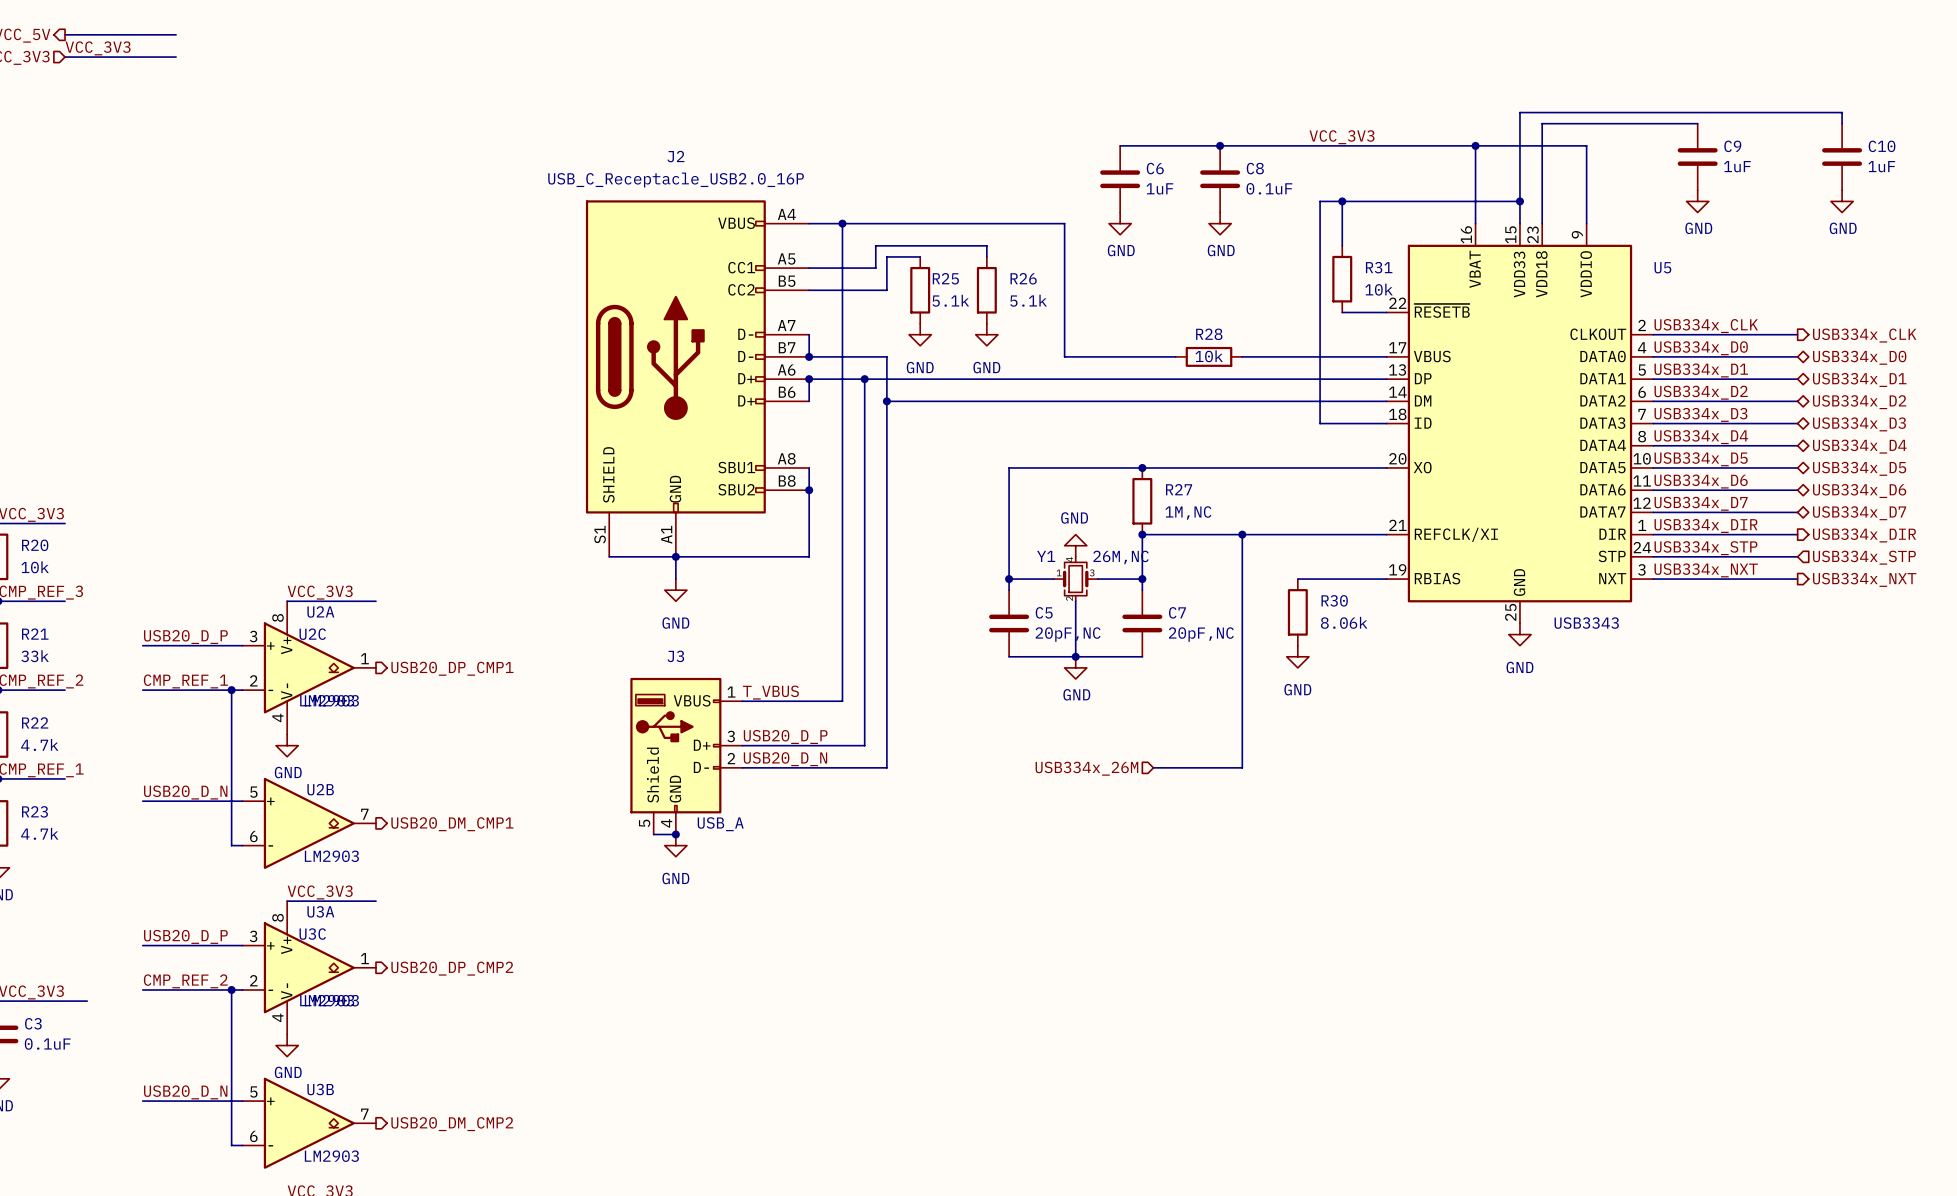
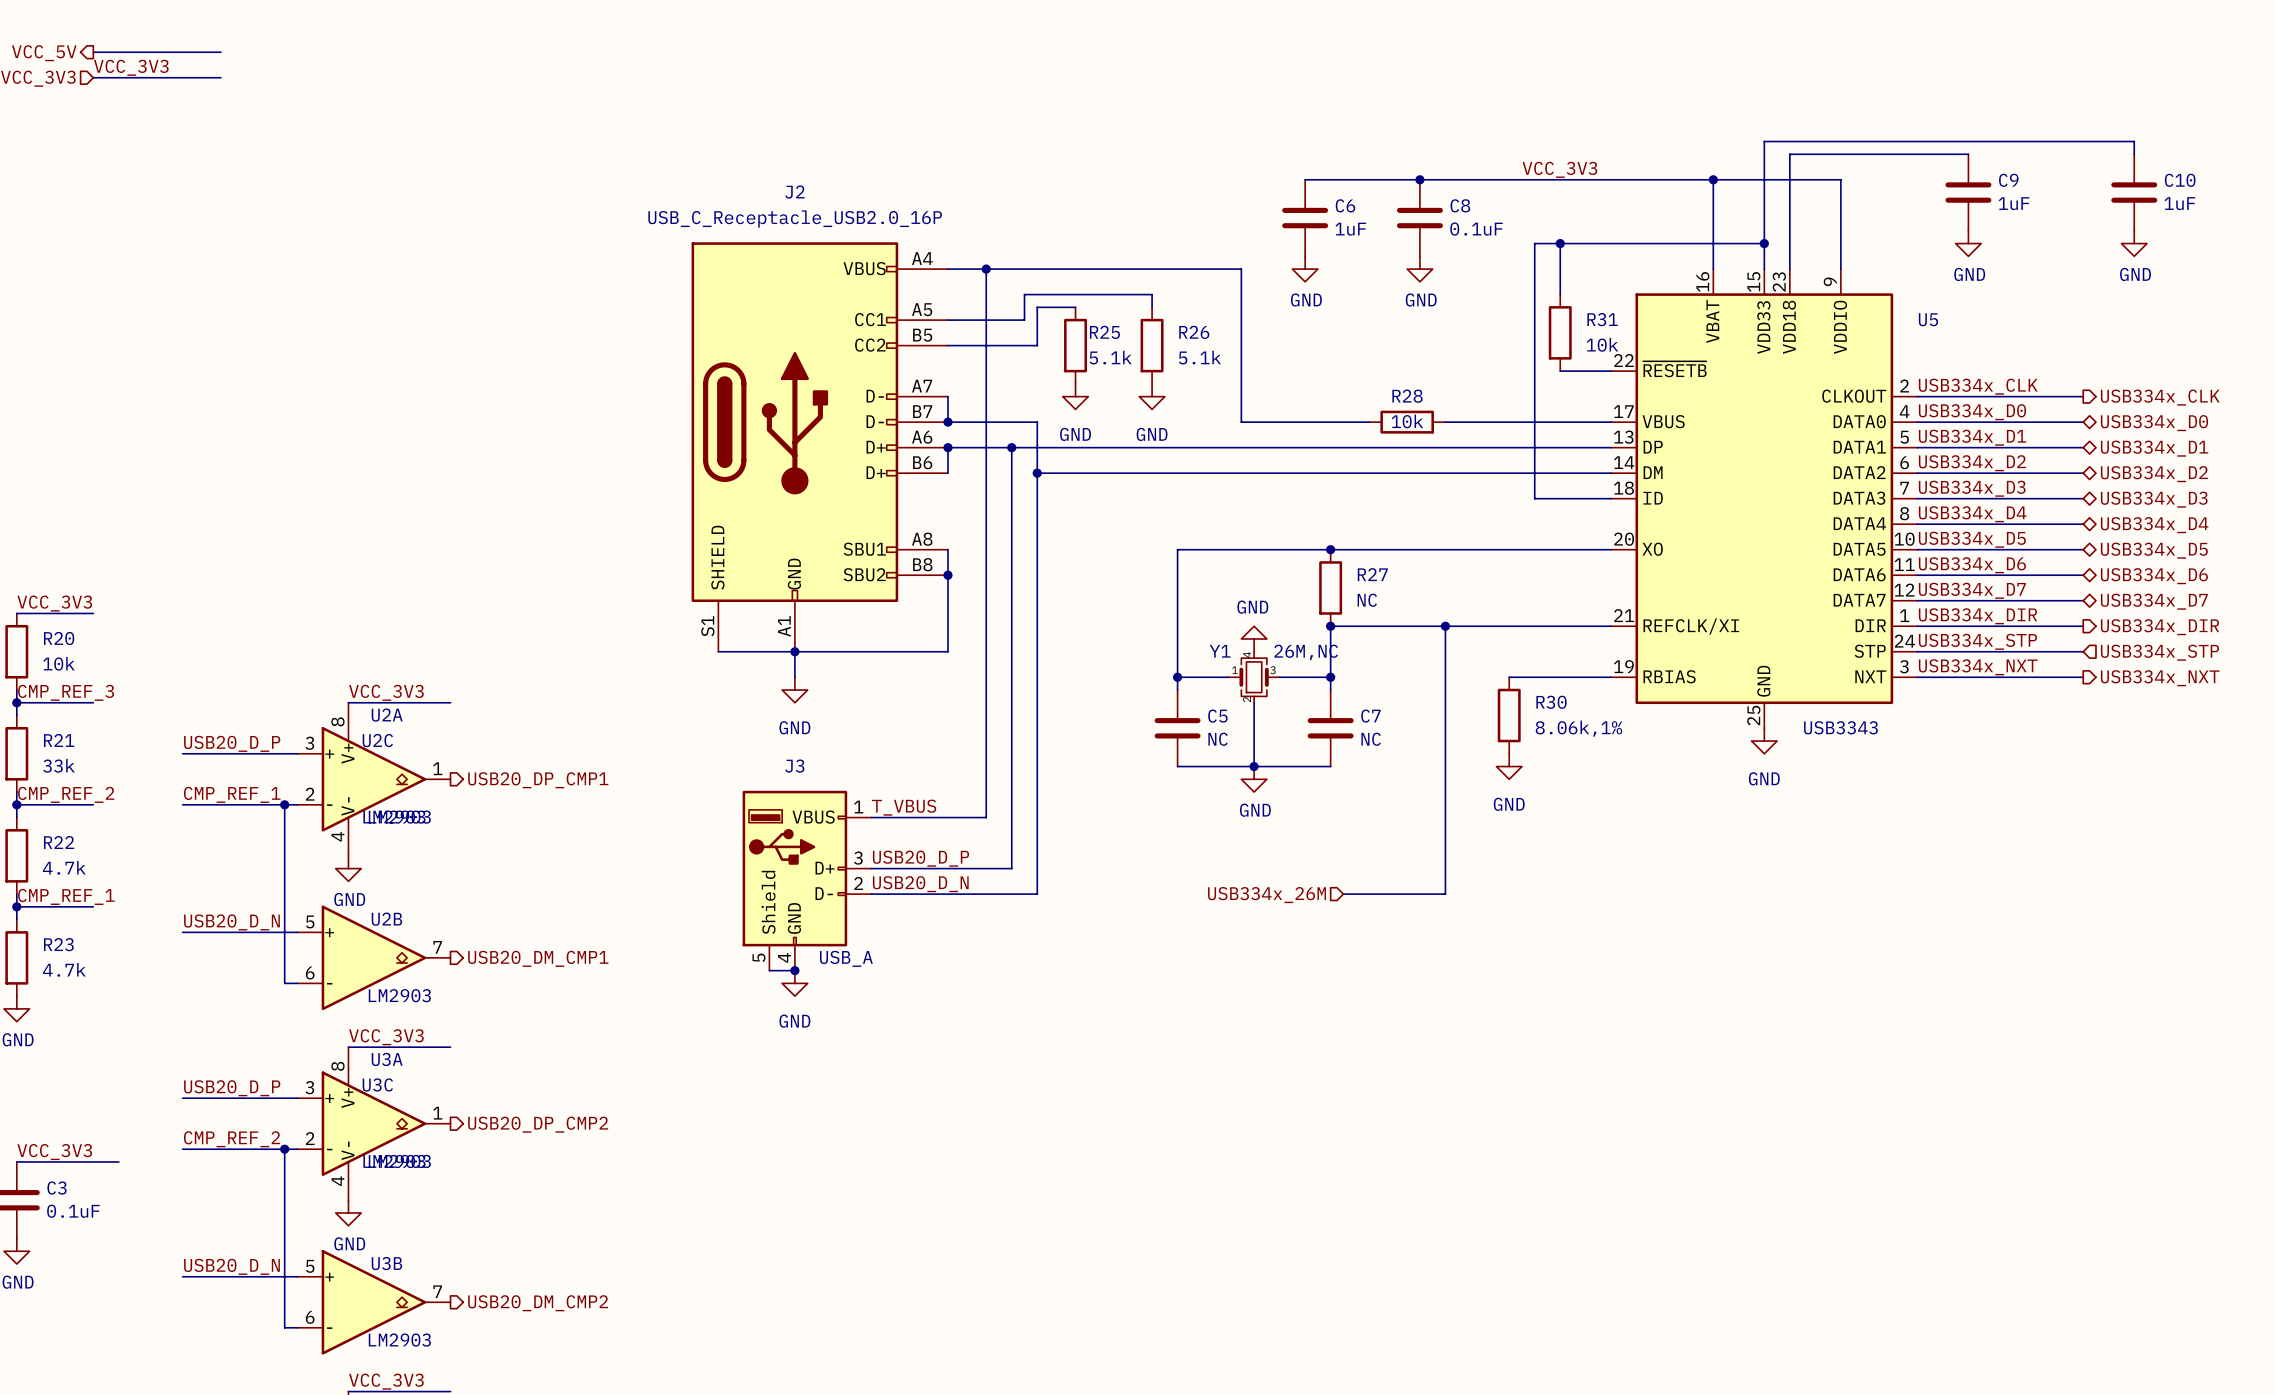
R27 value: 1M,NC (1188, 513) -> NC (1367, 600)
R30 value: 8.06k (1344, 622) -> 8.06k,1% (1578, 728)
C5 value: 20pF,NC (1068, 634) -> NC (1218, 739)
C7 value: 20pF,NC (1201, 634) -> NC (1371, 739)

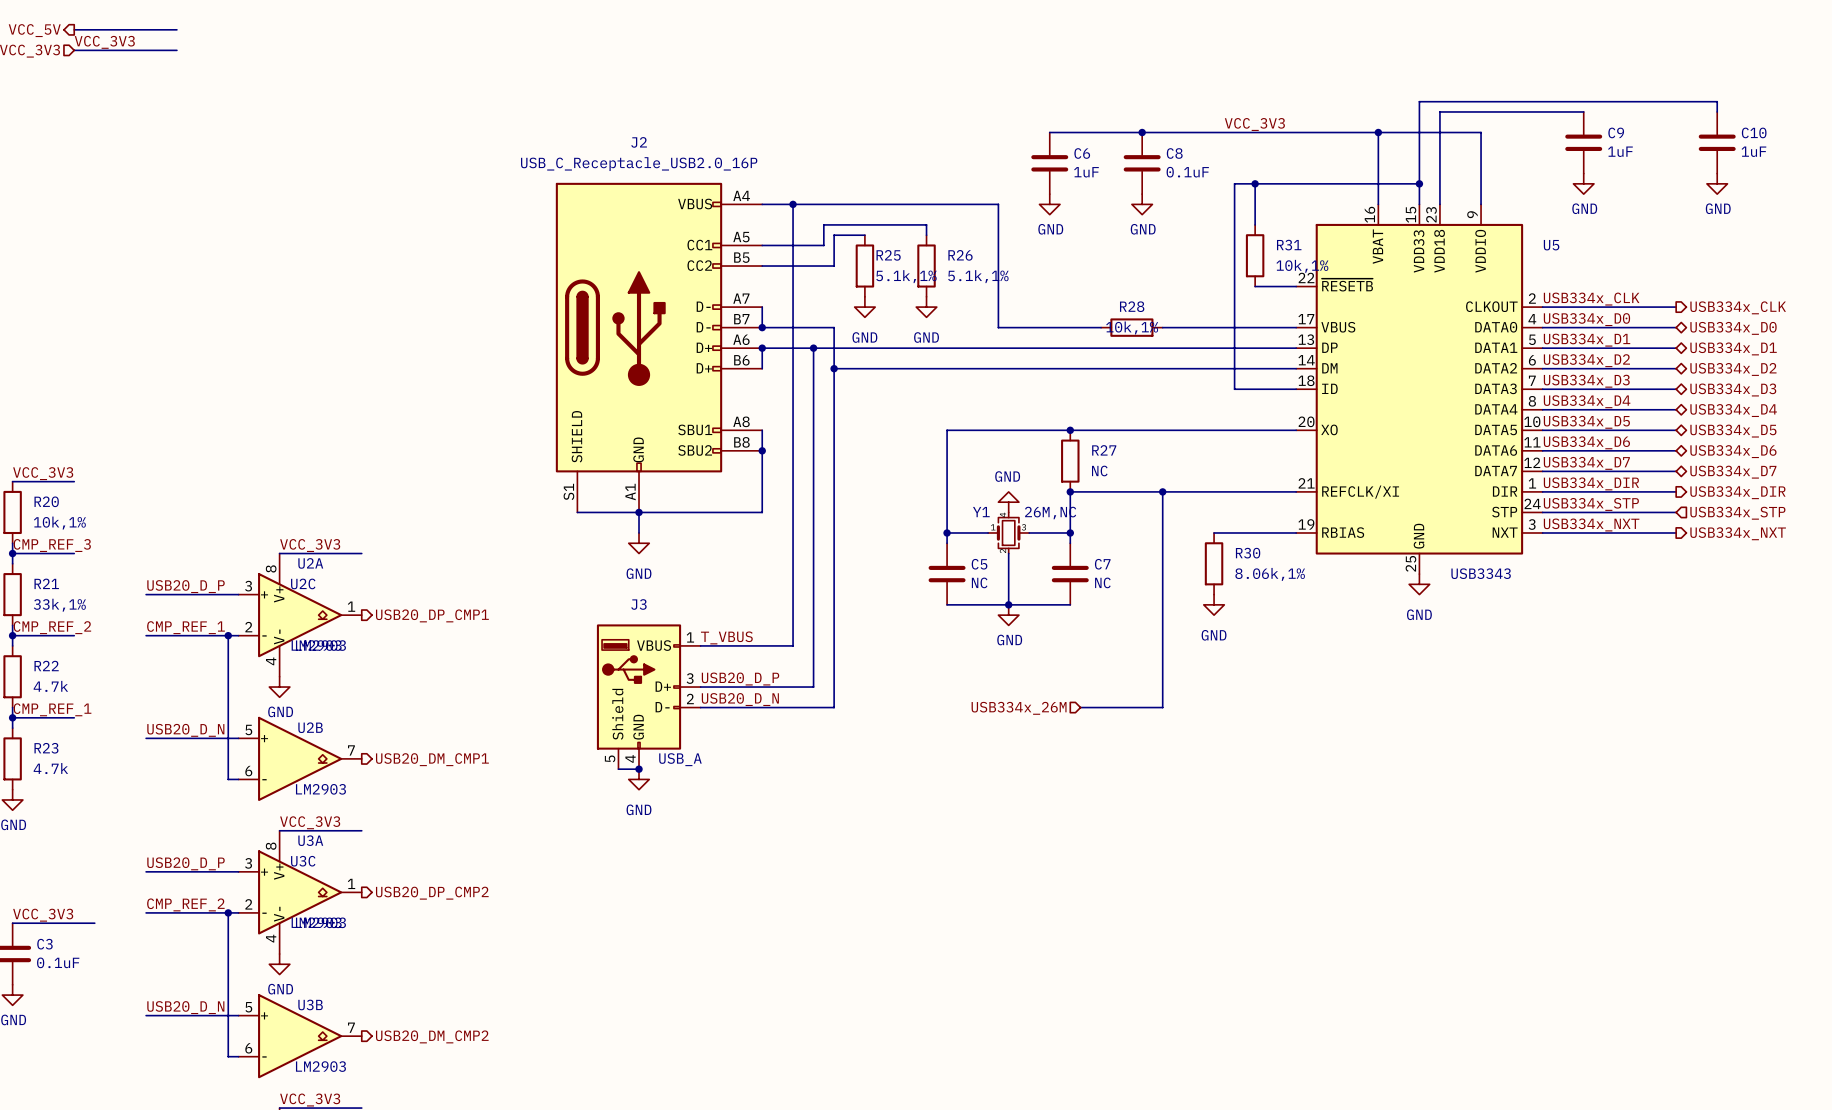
R31 value: 10k (1602, 344) -> 10k,1% (1302, 266)
R25 value: 5.1k (1110, 357) -> 5.1k,1% (906, 276)
R26 value: 5.1k (1199, 357) -> 5.1k,1% (978, 276)
R28 value: 10k (1407, 421) -> 10k,1% (1132, 327)
R20 value: 10k (59, 663) -> 10k,1% (59, 523)
R21 value: 33k (58, 765) -> 33k,1% (59, 605)

